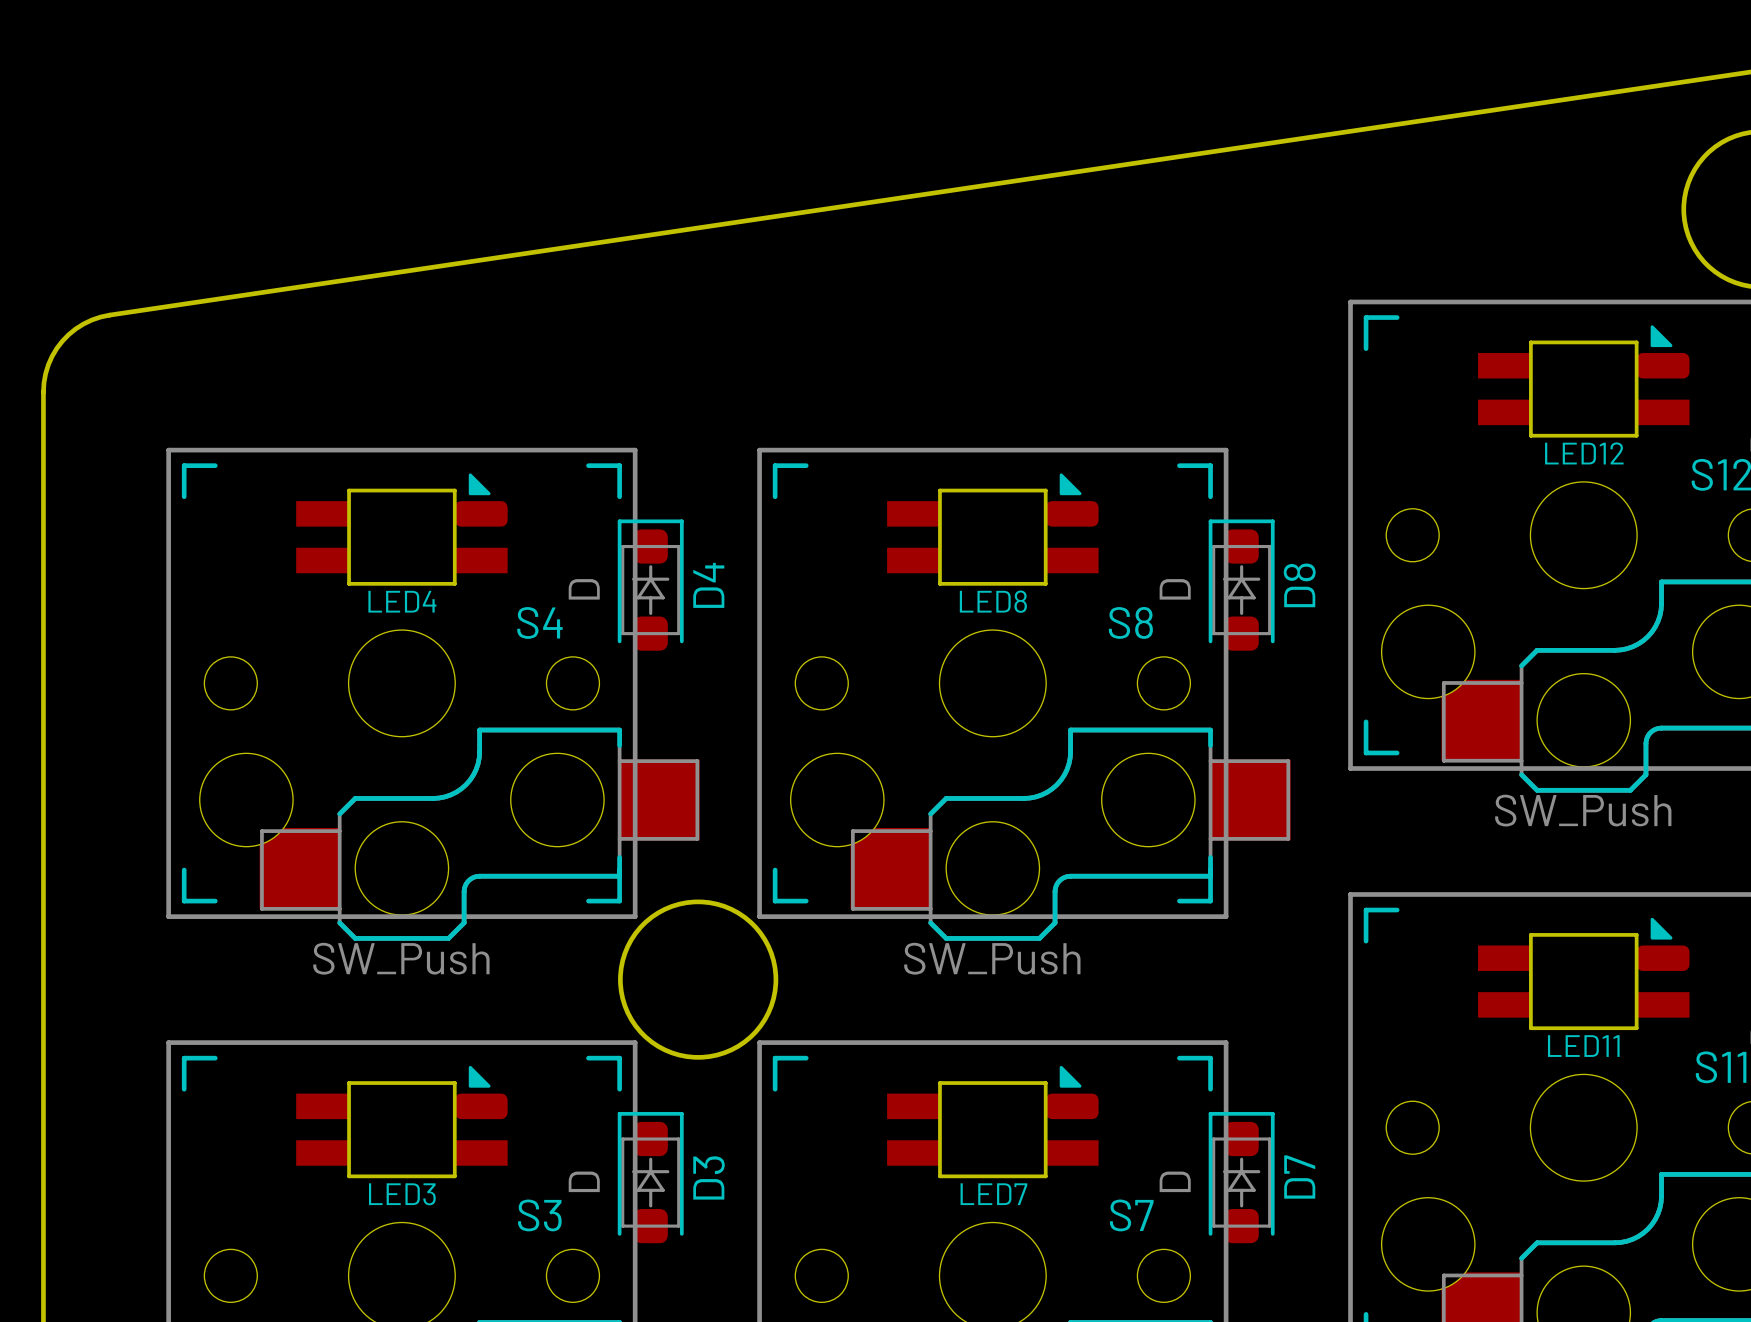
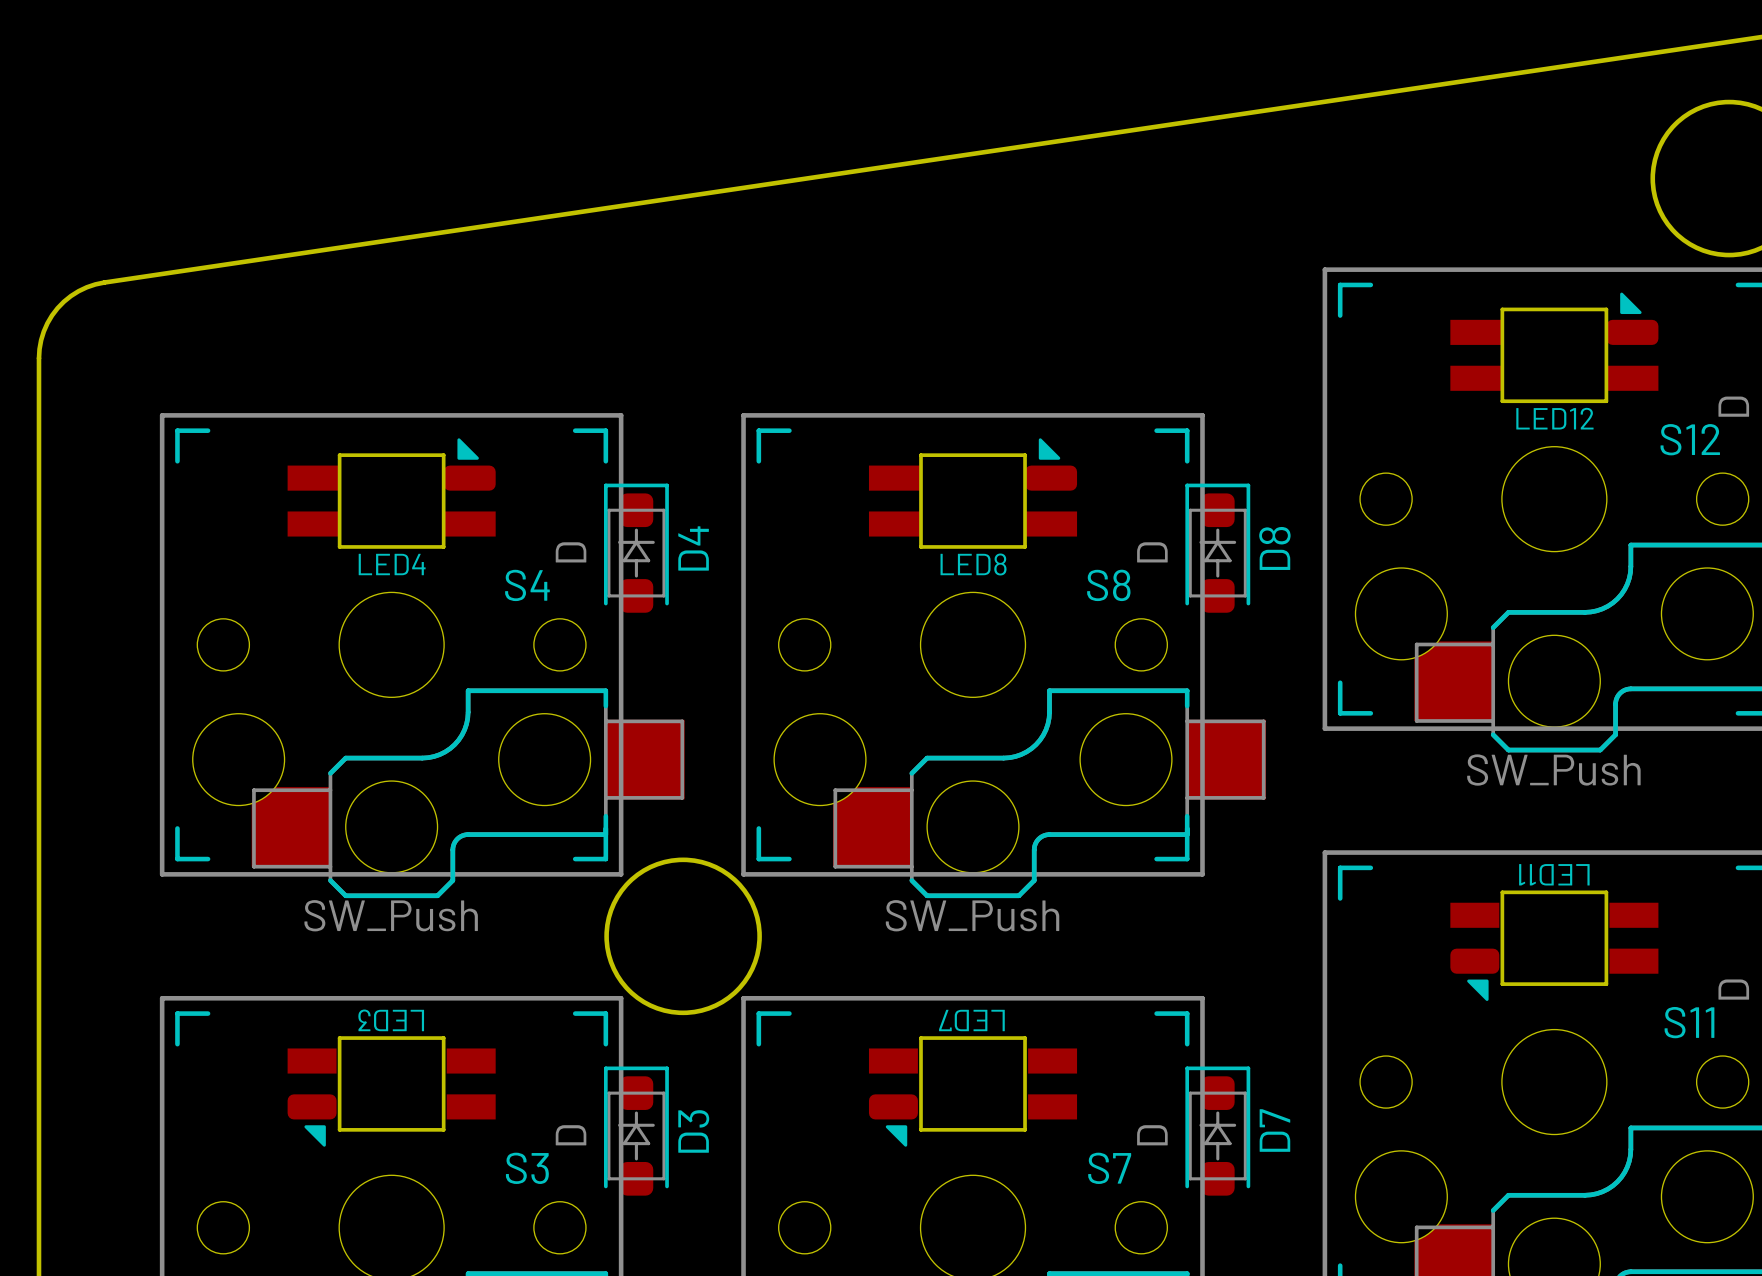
LED11 footprint: [1478, 917, 1690, 1031] -> [1450, 890, 1659, 1001]
LED11 name position: LED11 (1583, 1046) -> LED11 (1554, 874)
LED3 footprint: [296, 1065, 508, 1179] -> [287, 1036, 496, 1147]
LED7 footprint: [887, 1065, 1099, 1179] -> [868, 1036, 1078, 1147]
LED3 name position: LED3 (402, 1194) -> LED3 (391, 1020)
LED7 name position: LED7 (993, 1194) -> LED7 (971, 1020)

